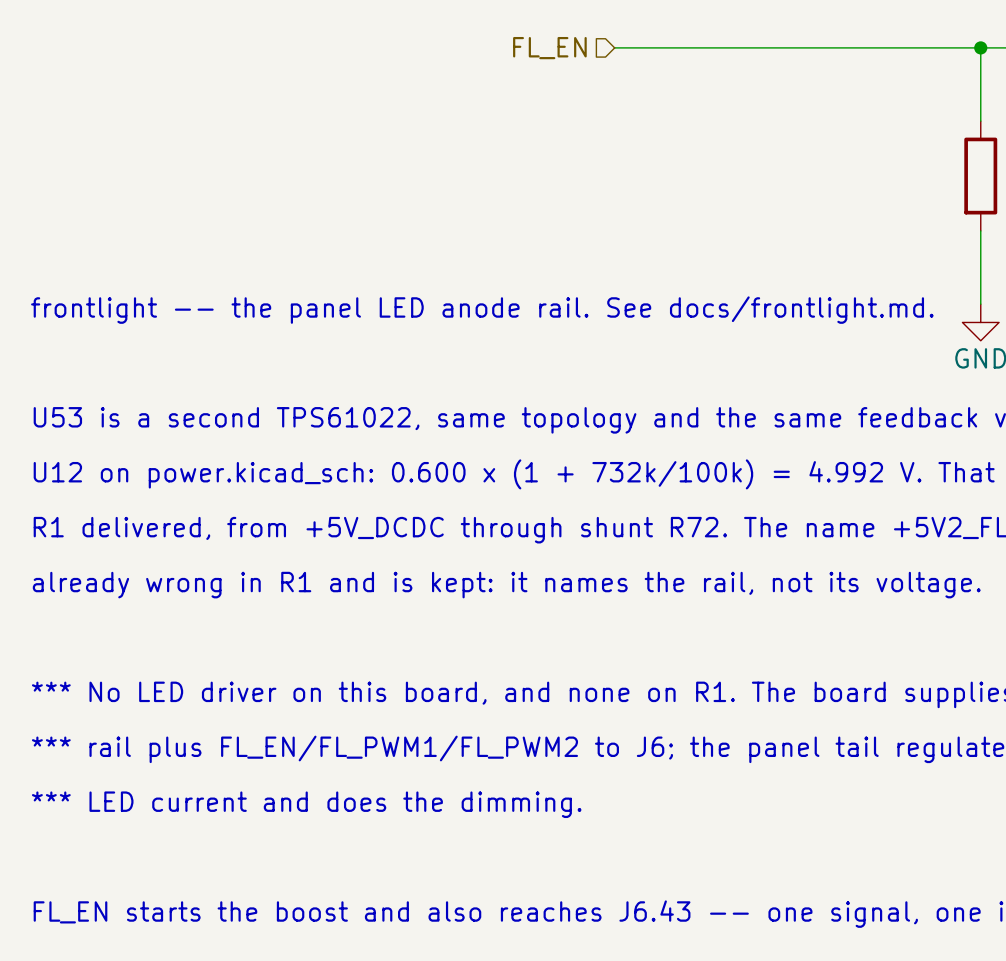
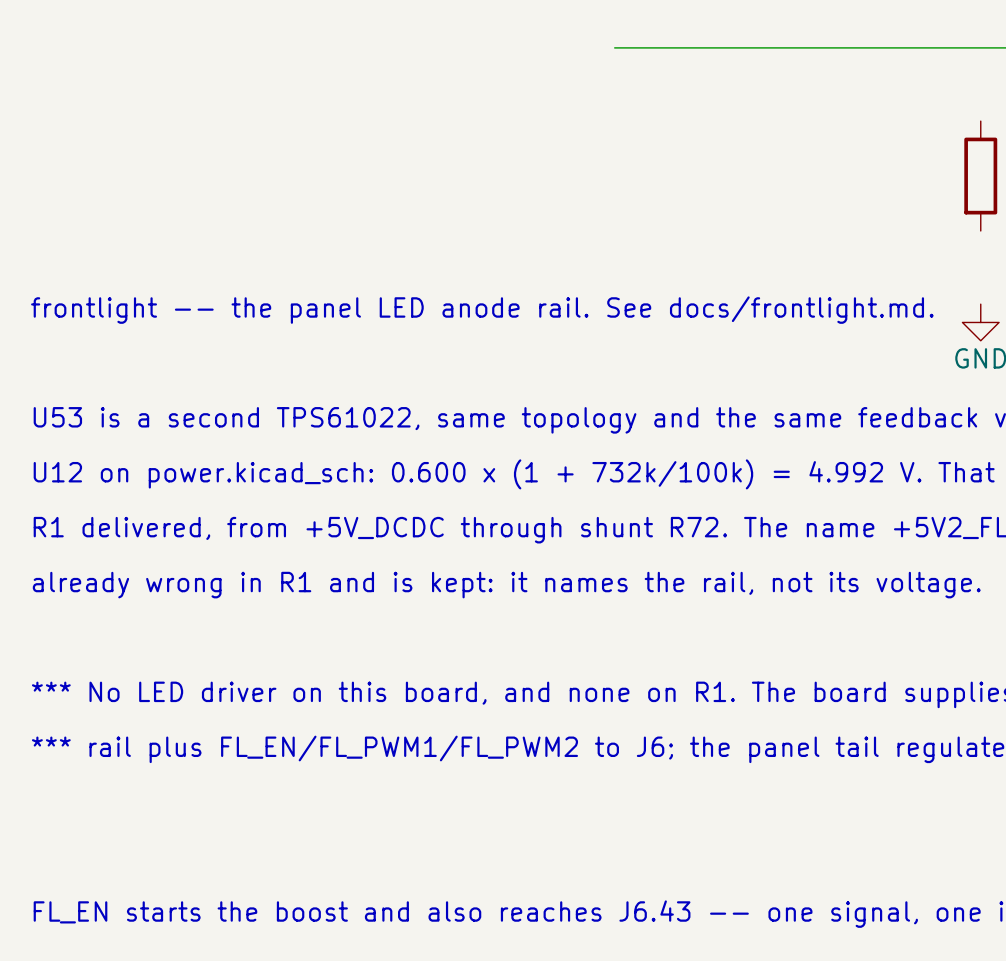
wire: (980, 47) (980, 121) -> none
junction: (980, 47) -> none
hierarchical label: FL_EN (549, 48) -> none
wire: (980, 230) (980, 304) -> none
text: *** LED current and does the dimming. (306, 804) -> none

